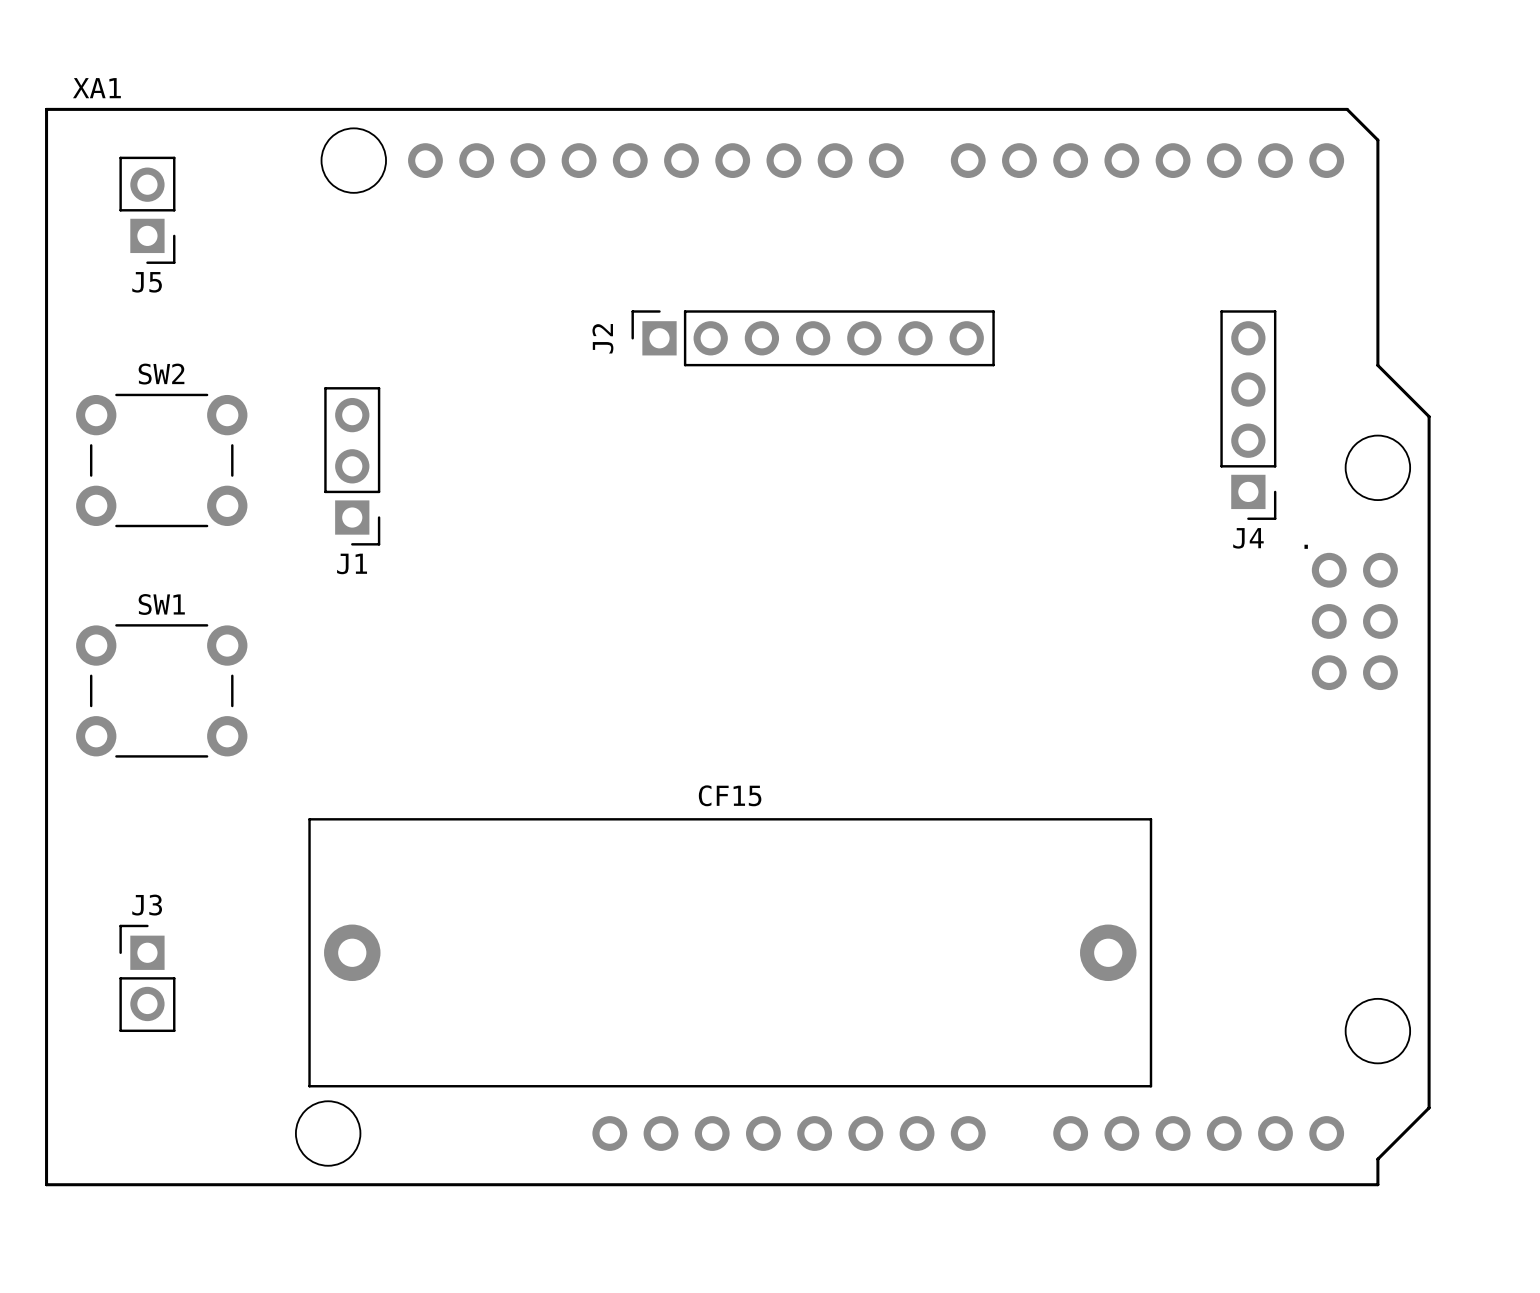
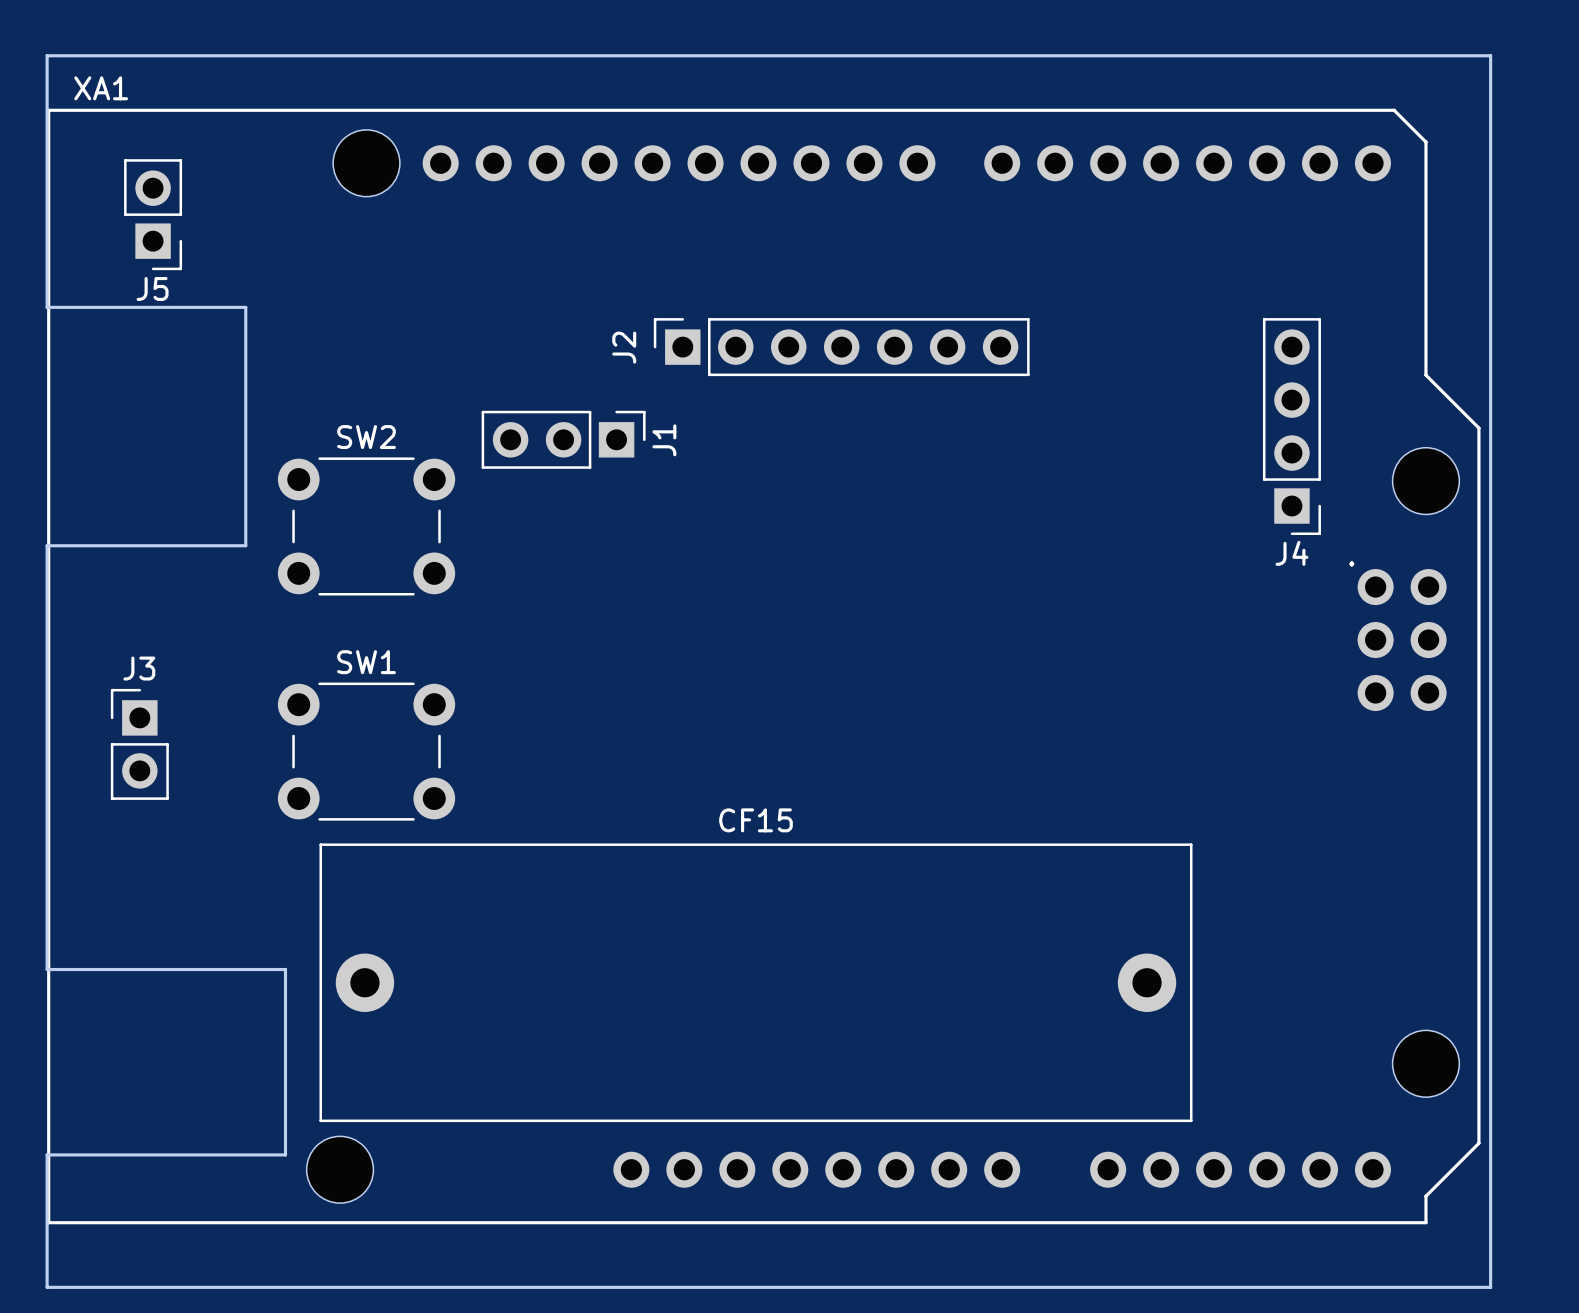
board edge: none -> (47, 55) (47, 307) (245, 307) (245, 545) (47, 545) (47, 969) (285, 969) (285, 1154) (47, 1154) (47, 1287) (1490, 1287) (1490, 55) (47, 55)
SW2 position: (161, 460) -> (366, 526)
J1 rotation: 0° (352, 466) -> 90° counterclockwise (563, 439)
J1 position: (352, 466) -> (563, 439)
SW1 position: (161, 690) -> (366, 751)
J3 position: (147, 978) -> (139, 744)

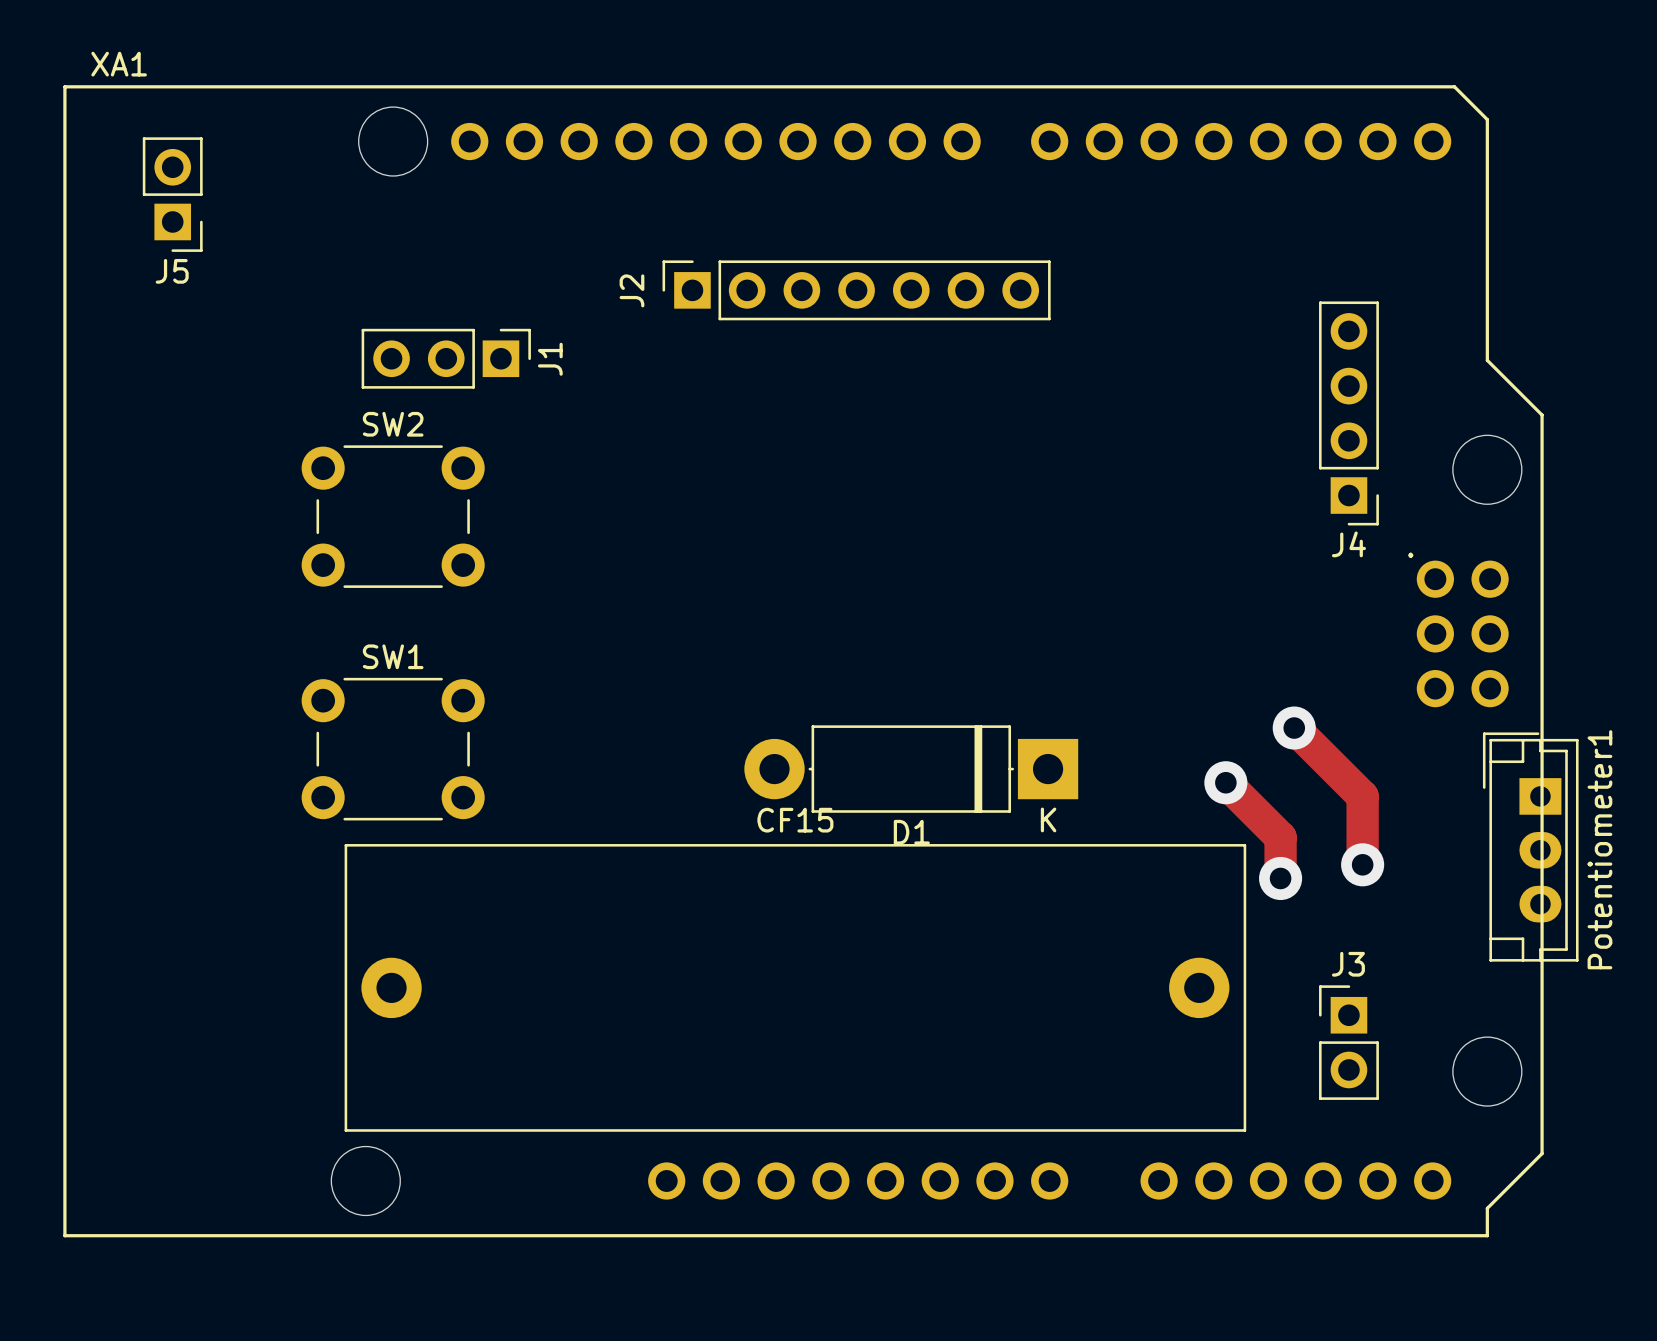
board edge: (47, 55) (47, 307) (245, 307) (245, 545) (47, 545) (47, 969) (285, 969) (285, 1154) (47, 1154) (47, 1287) (1490, 1287) (1490, 55) (47, 55) -> none
J2 position: (841, 347) -> (856, 290)
J1 position: (563, 439) -> (446, 358)
track: none -> (1294, 728) (1362, 796) (1362, 864)
via: none -> (1294, 728)
J3 position: (139, 744) -> (1348, 1042)
D1: none -> (911, 769)
track: none -> (1225, 782) (1280, 837) (1280, 878)
via: none -> (1225, 782)
Potentiometer1: none -> (1530, 847)
via: none -> (1362, 864)
via: none -> (1280, 878)

